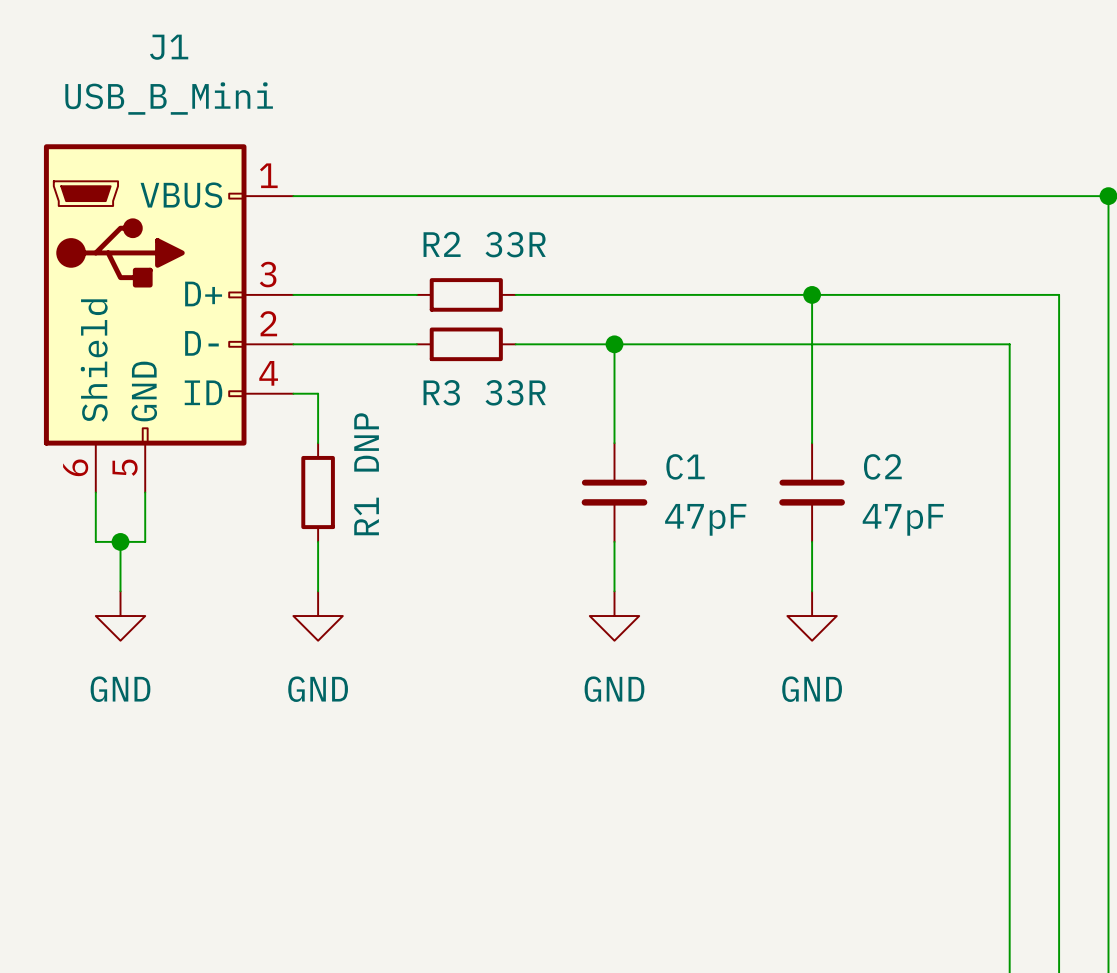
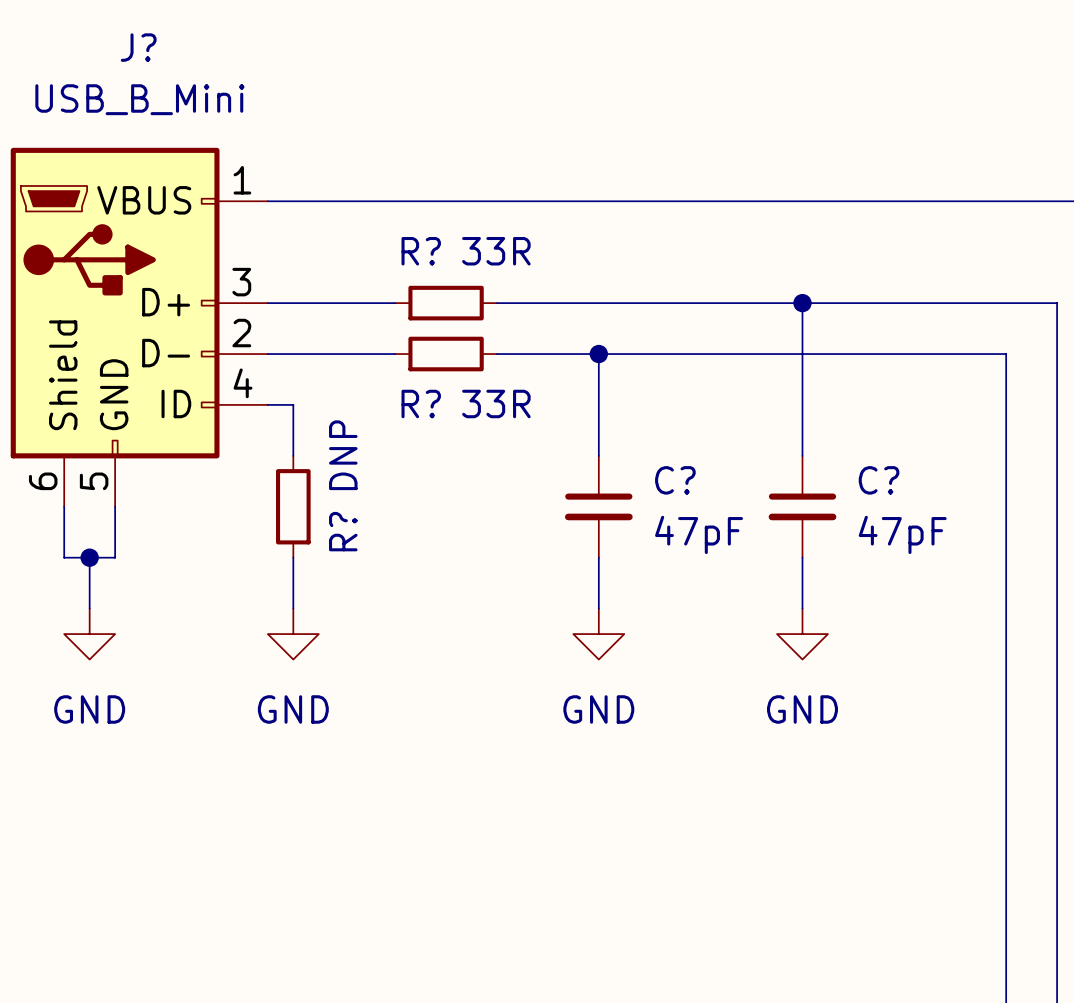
J1 name: J1 (169, 47) -> J? (138, 47)
R2 name: R2 (442, 244) -> R? (421, 251)
R3 name: R3 (441, 392) -> R? (421, 403)
C1 name: C1 (685, 466) -> C? (675, 480)
C2 name: C2 (882, 466) -> C? (879, 480)
R1 name: R1 (366, 516) -> R? (343, 531)

